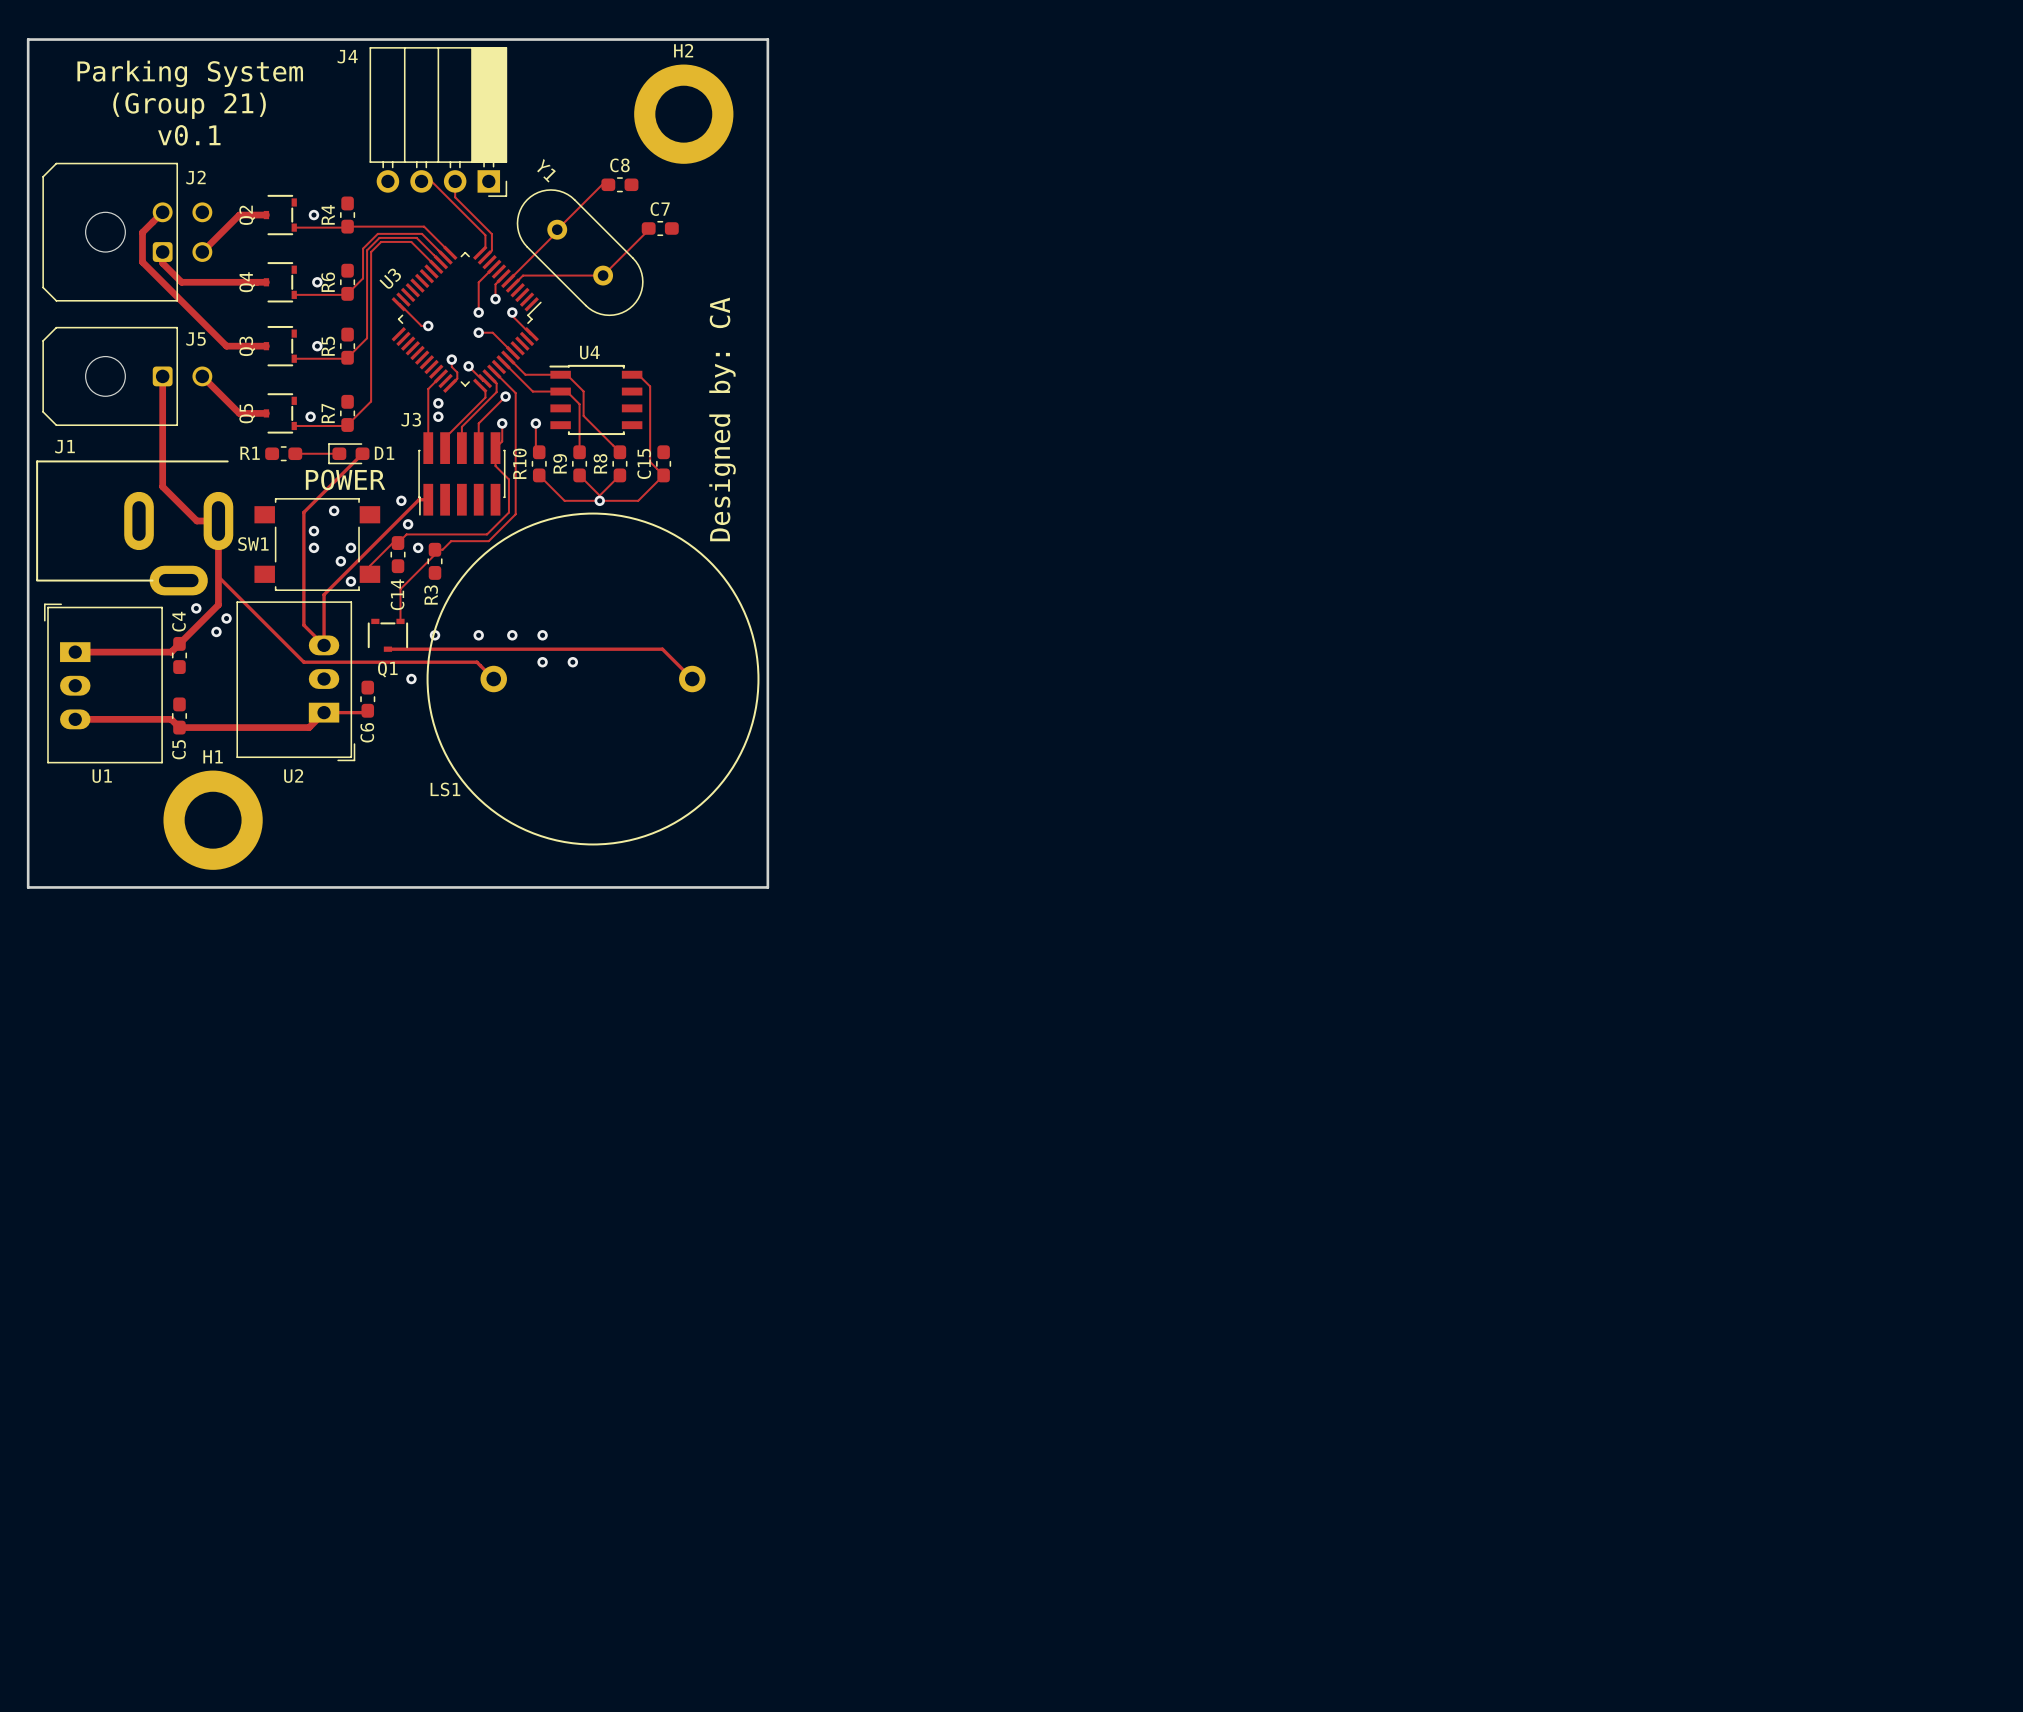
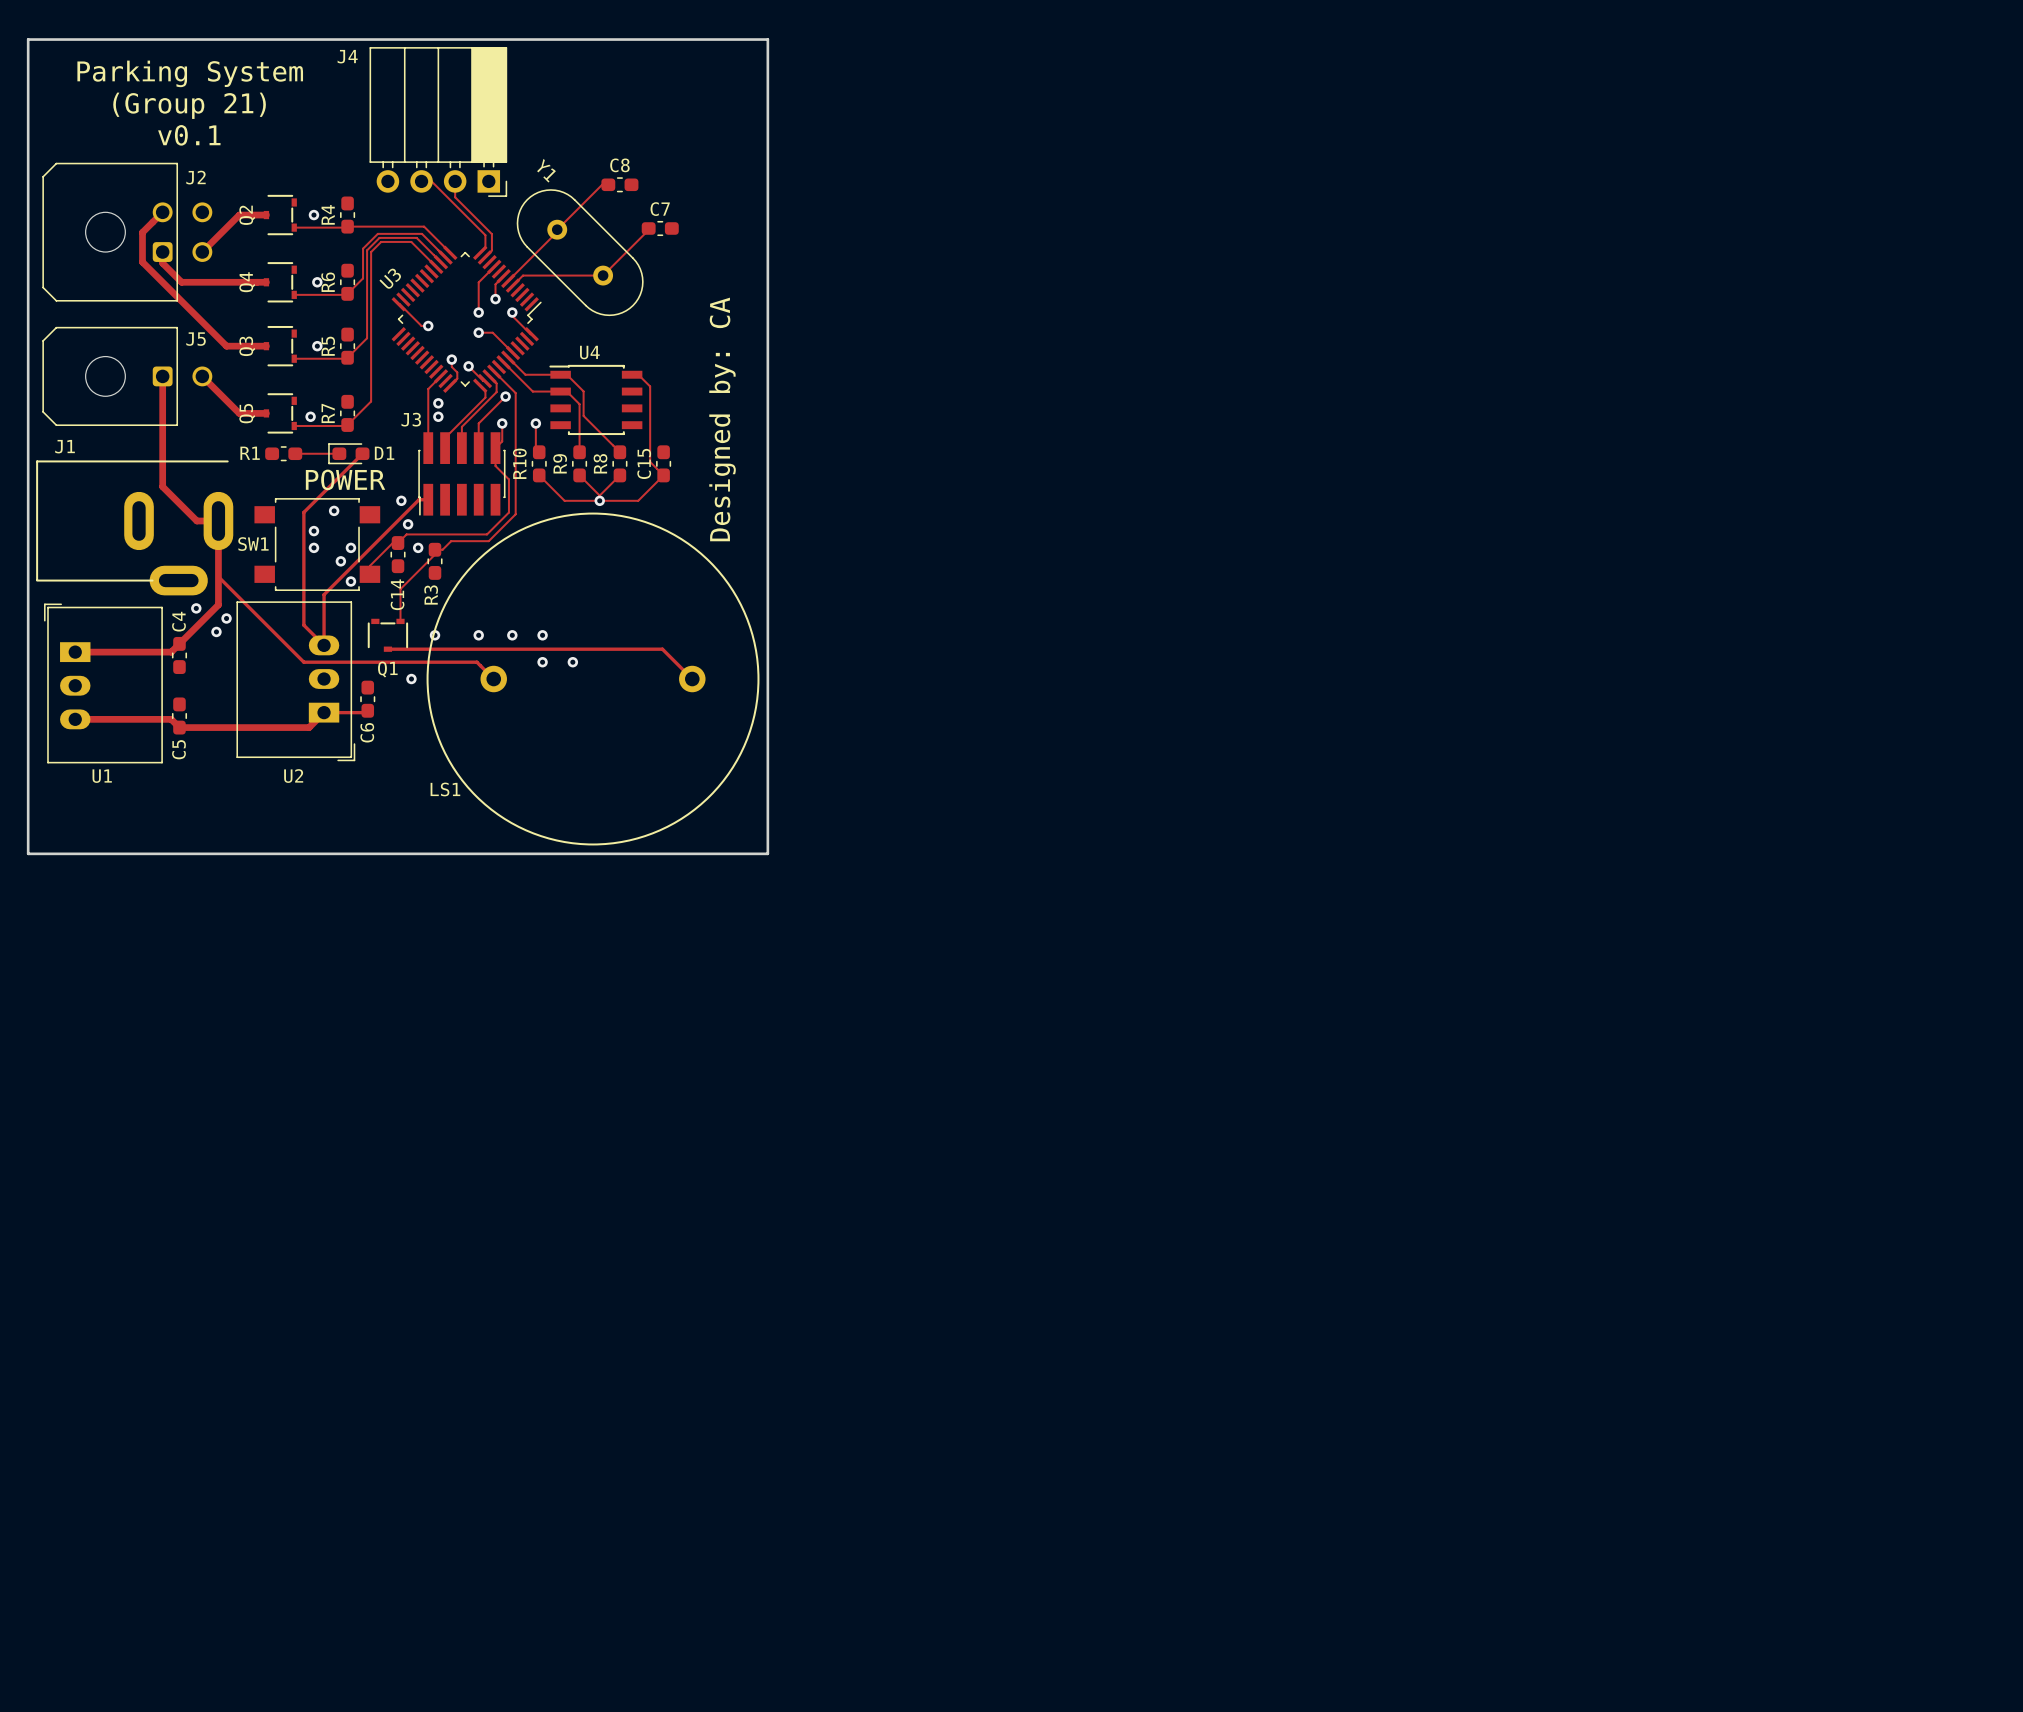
H2: (683, 114) -> none
H1: (213, 820) -> none
board edge: (28, 853) (28, 887) (767, 887) (767, 853) -> (28, 853) (767, 853)

